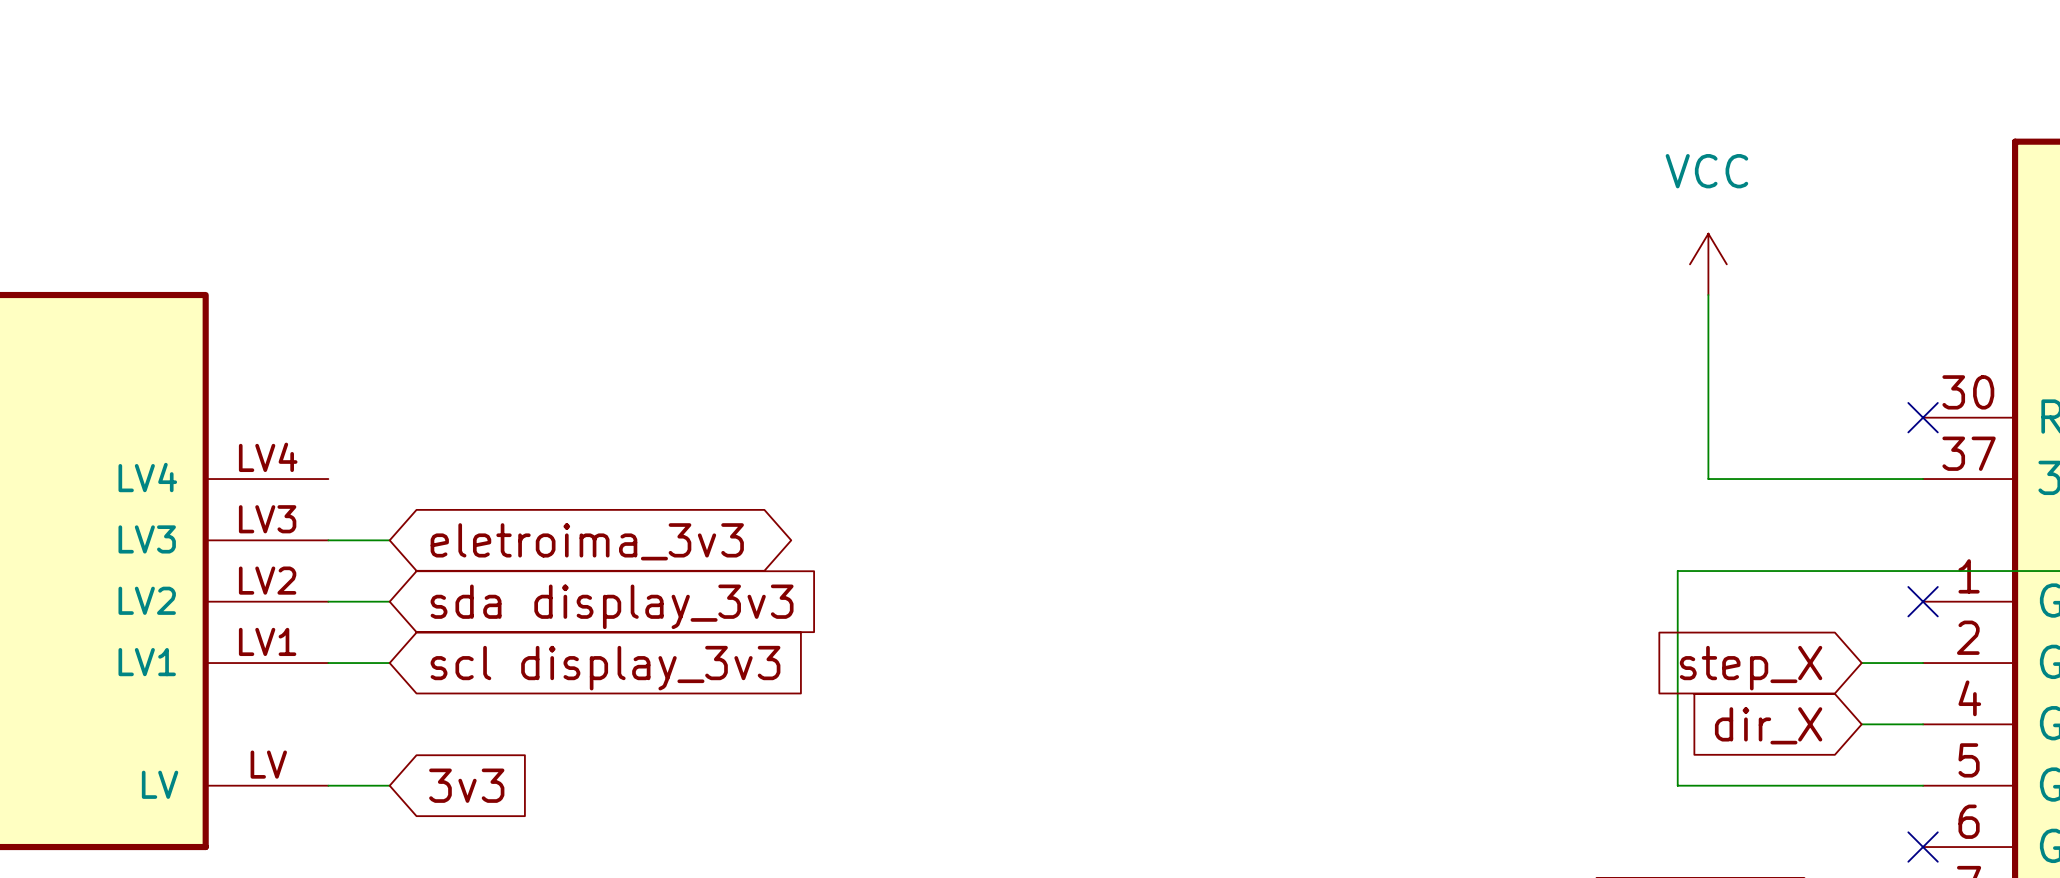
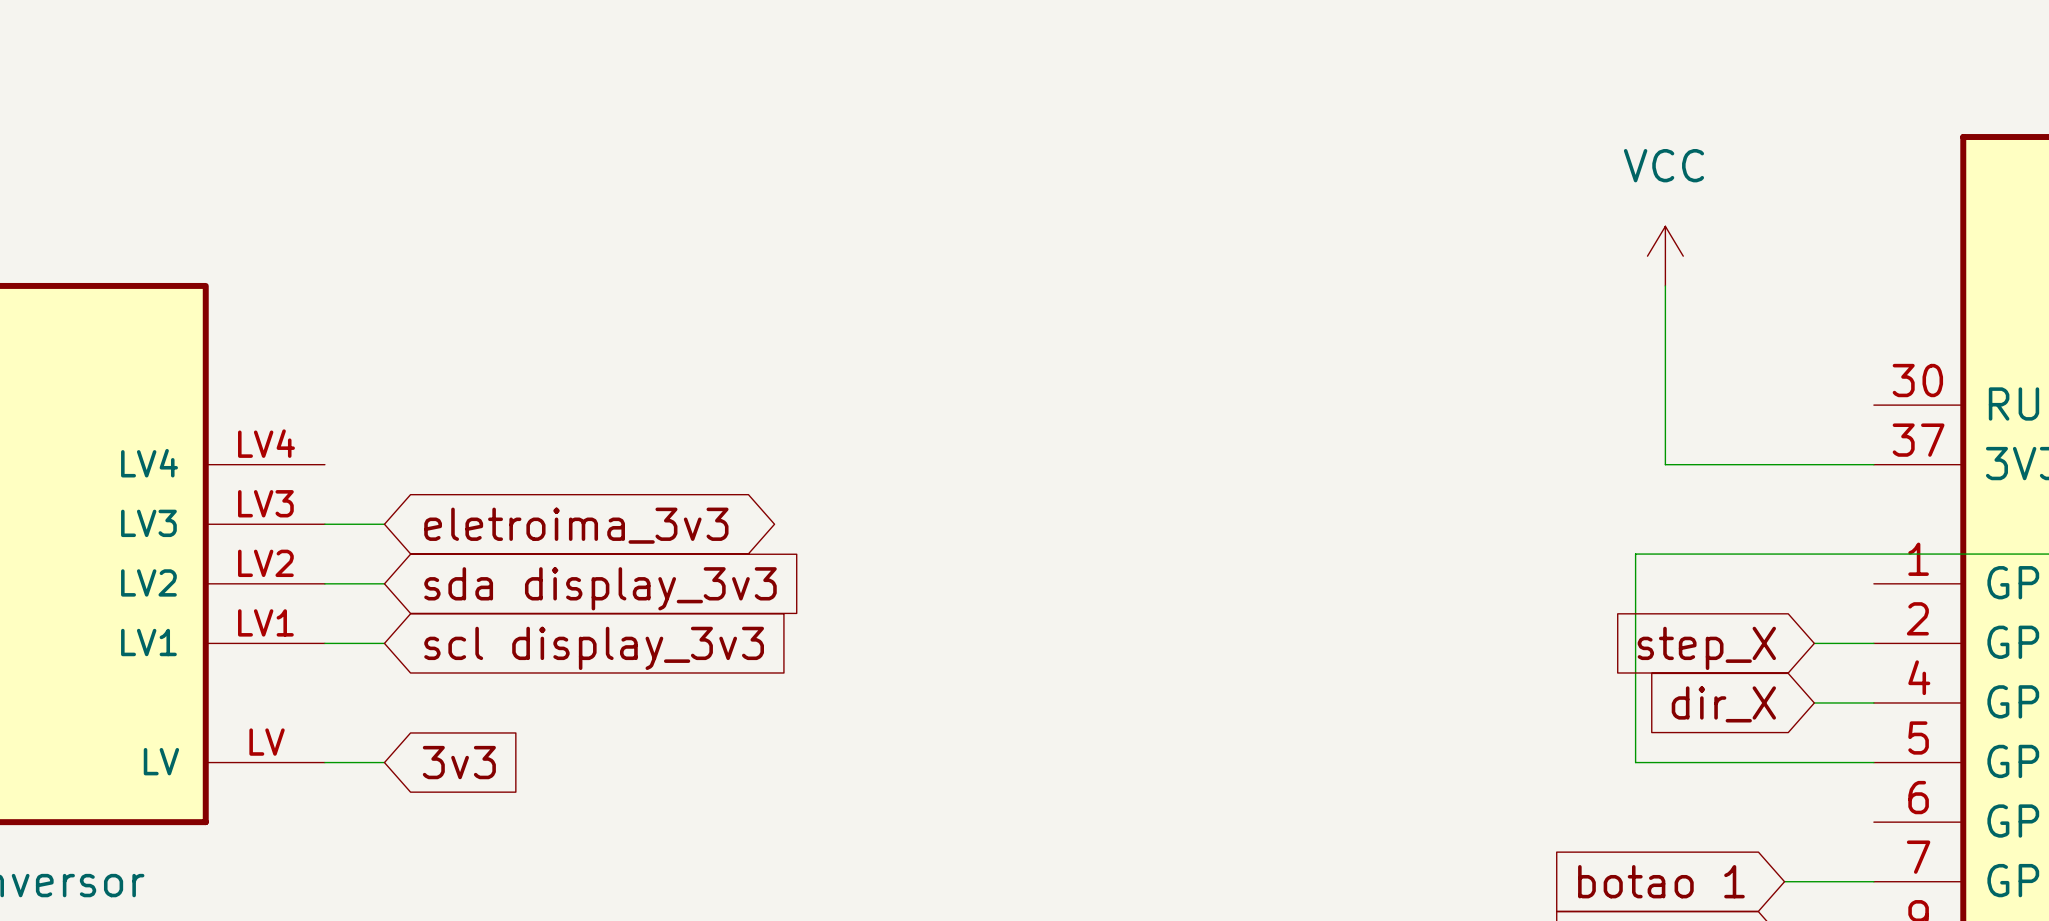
no-connect mark: (1923, 417) -> none
no-connect mark: (1923, 601) -> none
no-connect mark: (1923, 847) -> none

